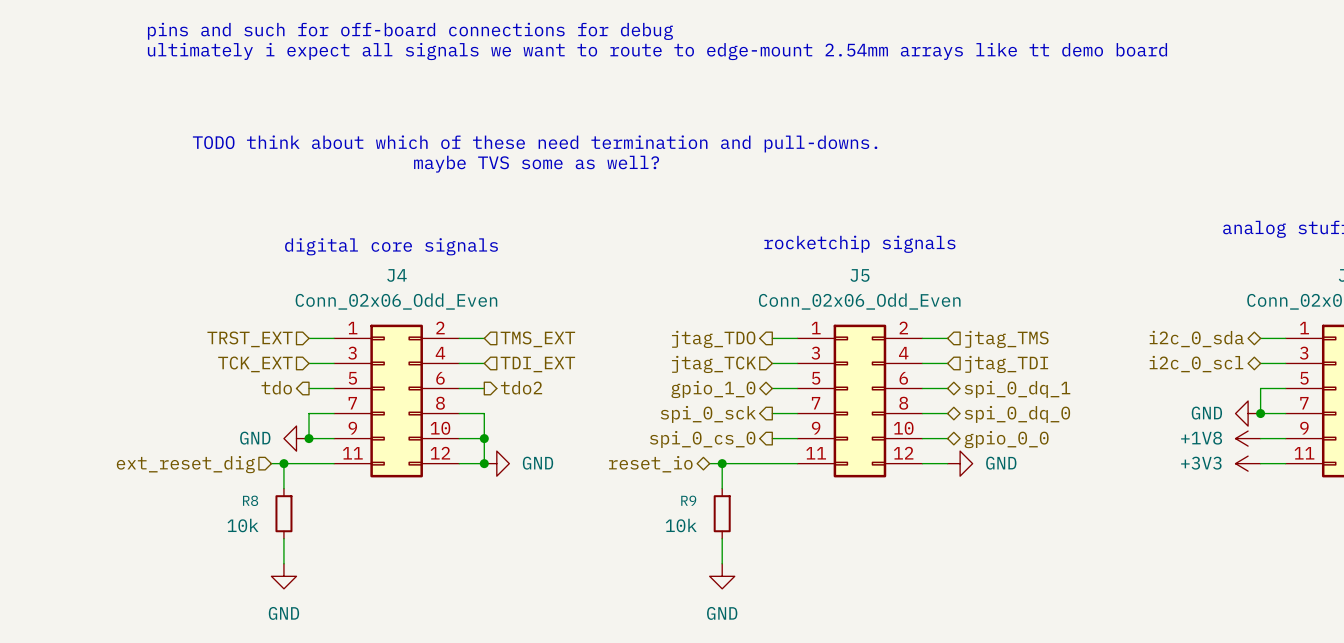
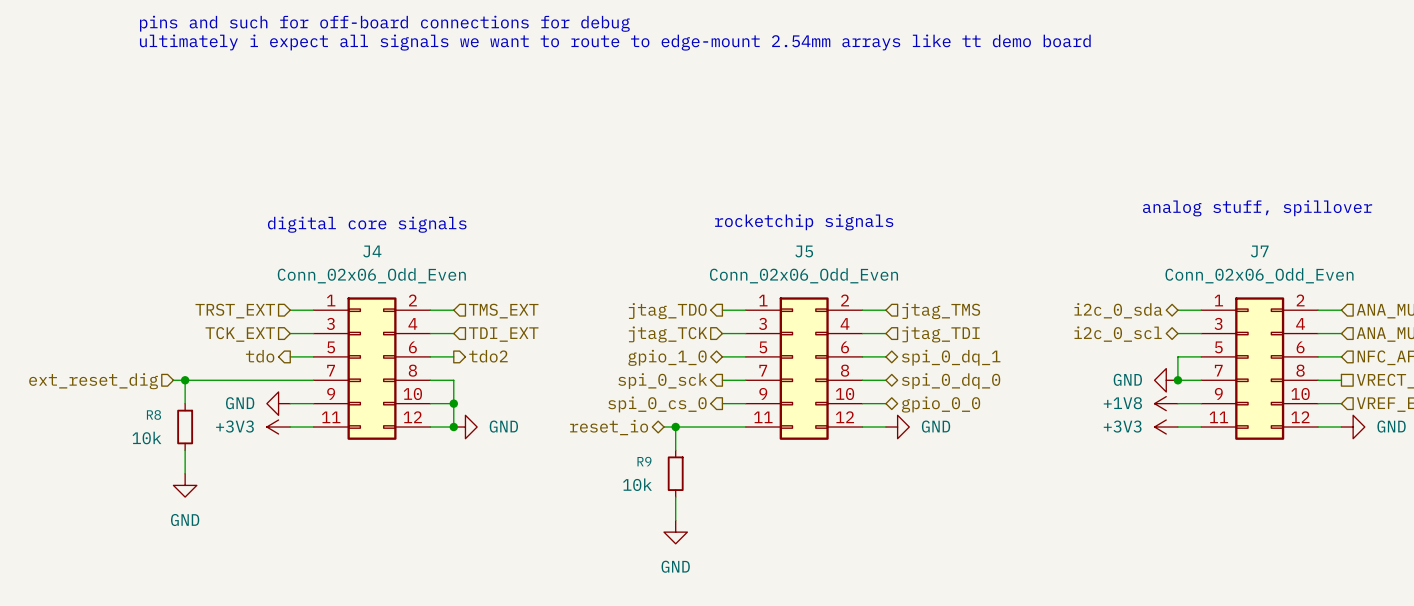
text: TODO think about which of these need termination and pull-downs. (535, 143) -> none
text: maybe TVS some as well? (536, 164) -> none
junction: none -> (185, 380)
wire: (309, 413) (309, 438) -> (290, 380) (173, 380)
junction: (309, 438) -> none
wire: (283, 463) (283, 488) -> (185, 380) (185, 403)
junction: (283, 463) -> none
power symbol: none -> +3V3 (278, 427)
hierarchical label position: ext_reset_dig (185, 464) -> ext_reset_dig (93, 381)
R8 position: (283, 513) -> (185, 427)
wire: (283, 538) (283, 563) -> (185, 450) (185, 473)
power symbol position: GND (283, 576) -> GND (185, 485)

